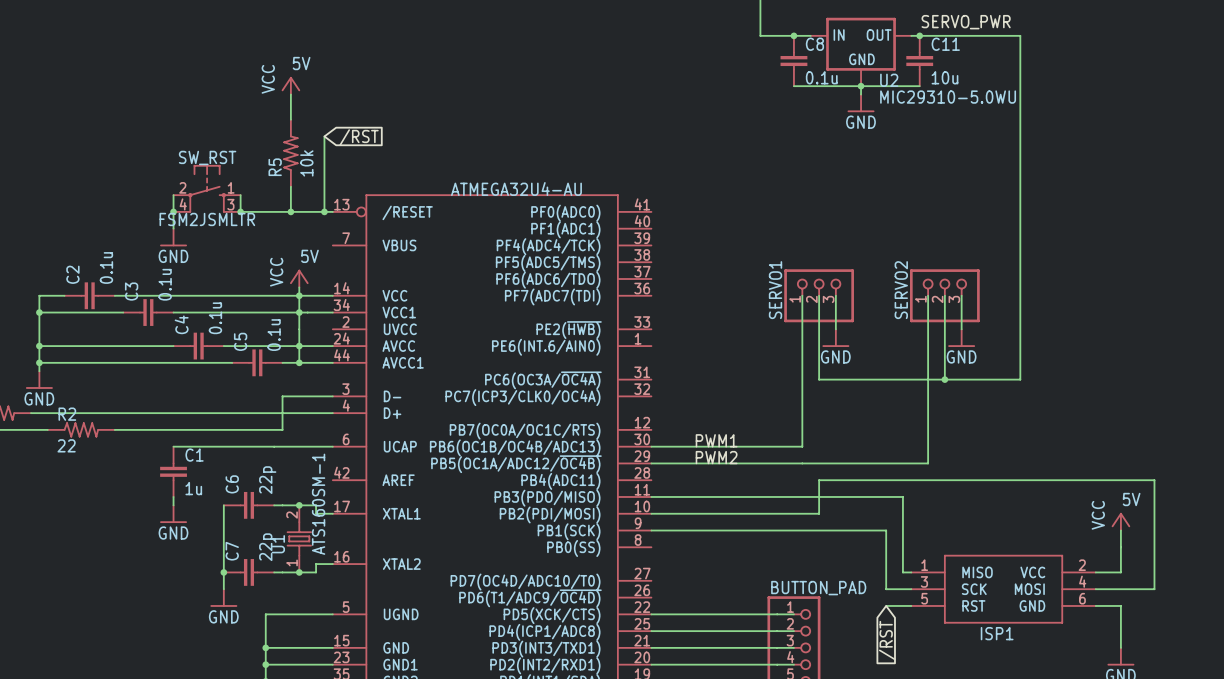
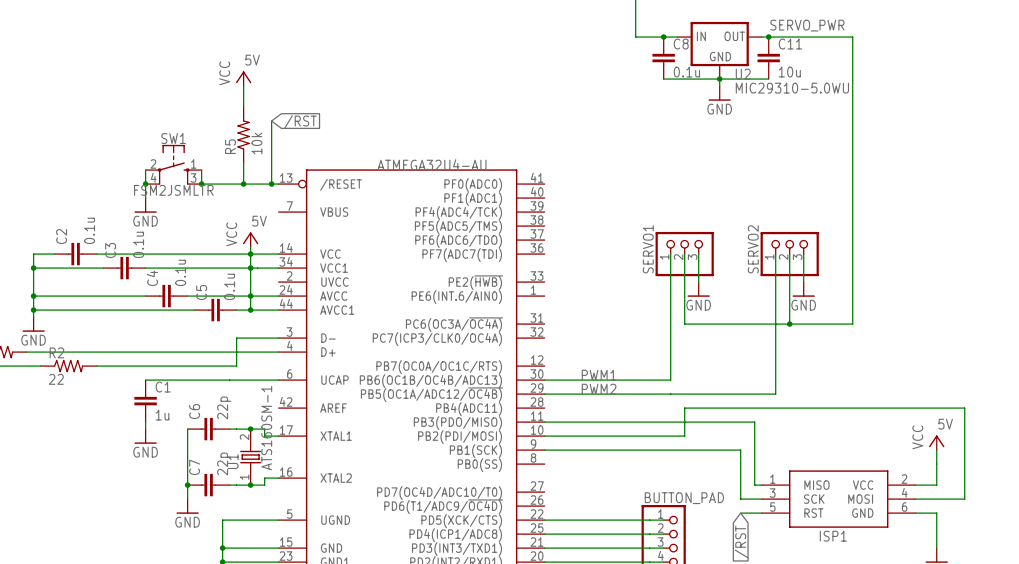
SW_RST name: SW_RST (207, 157) -> SW1 (173, 138)

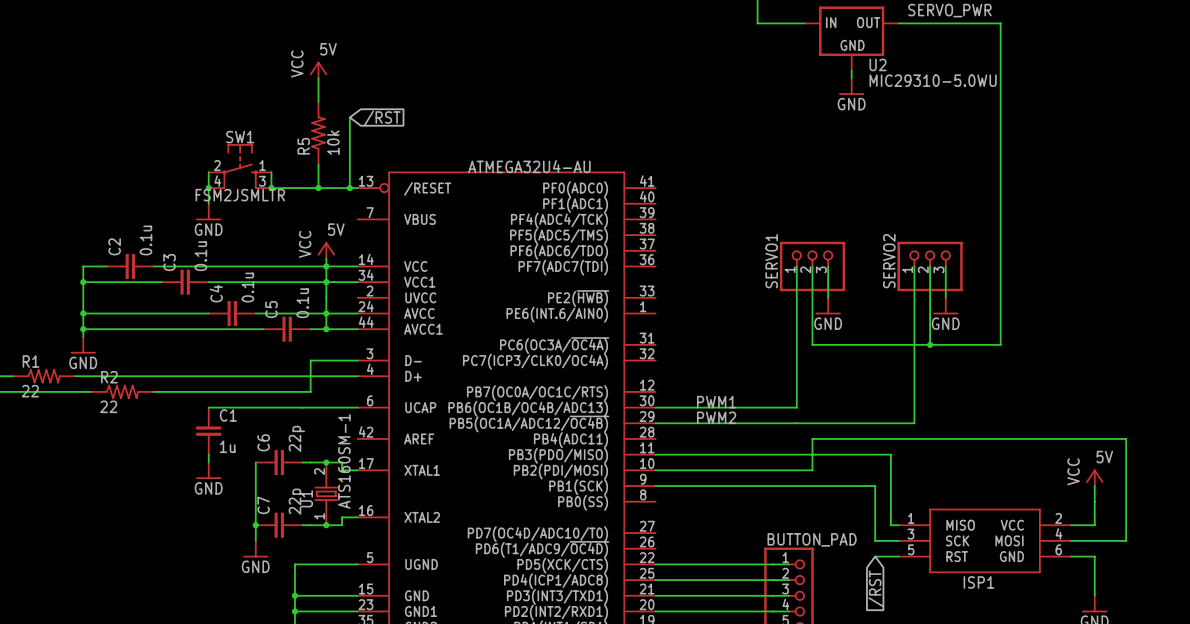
junction: (663, 37) -> none
junction: (768, 37) -> none
C8: 0.1u (663, 58) -> none
C11: 10u (768, 58) -> none
wire: (663, 79) (768, 79) -> none
junction: (719, 79) -> none

